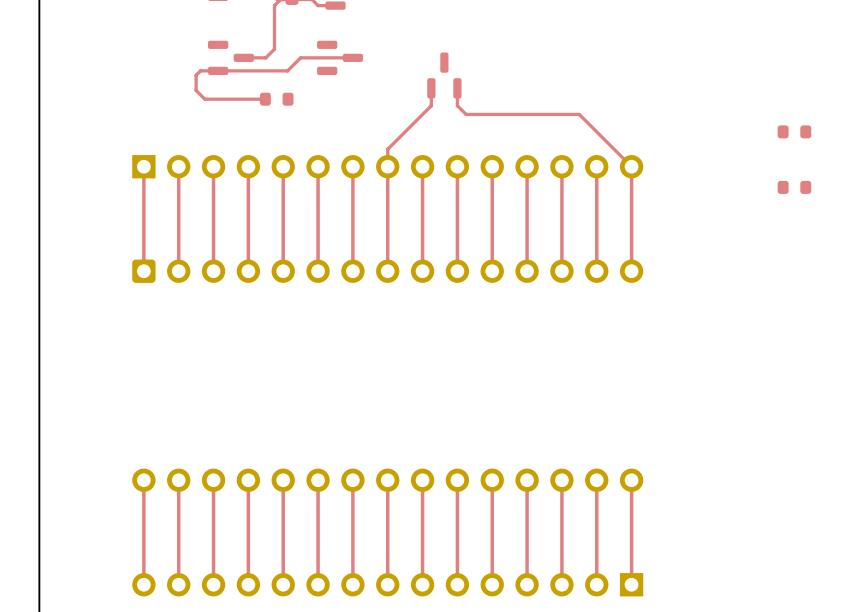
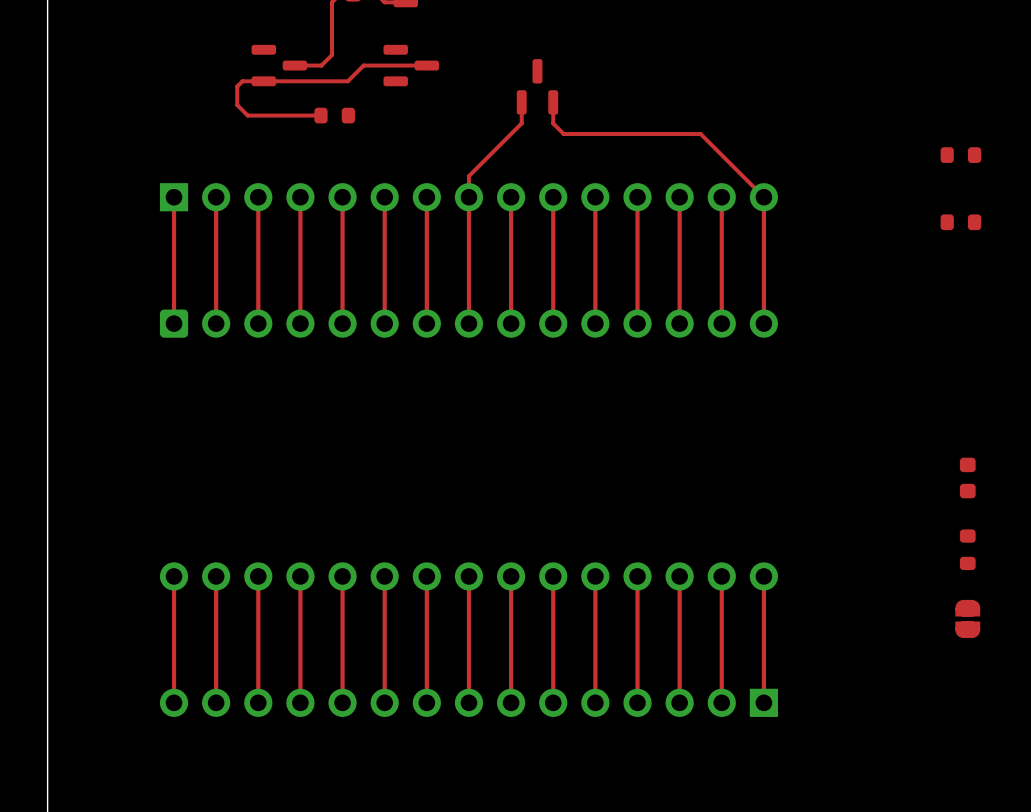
part: none -> (967, 477)
part: none -> (967, 549)
part: none -> (967, 618)

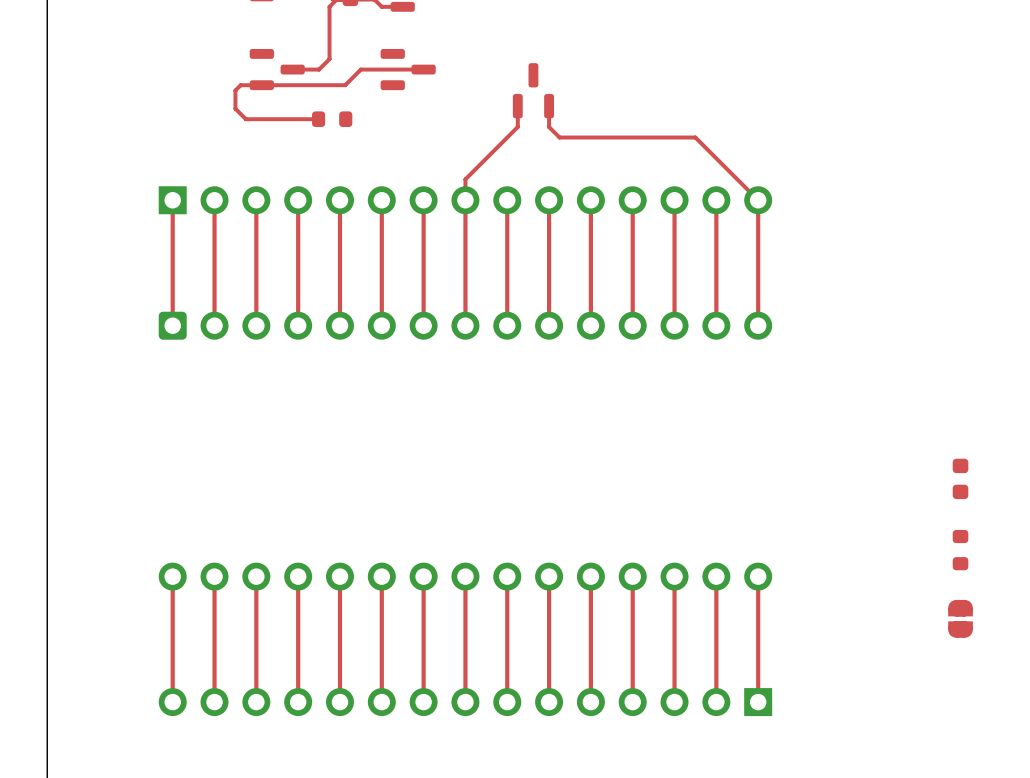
part: (960, 155) -> none
part: (960, 222) -> none

